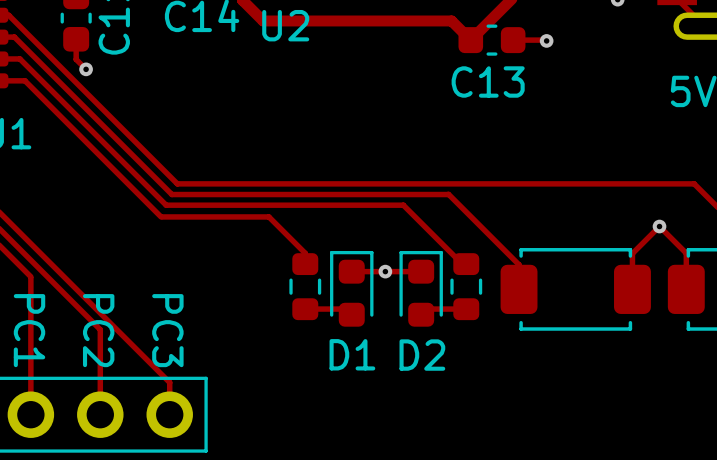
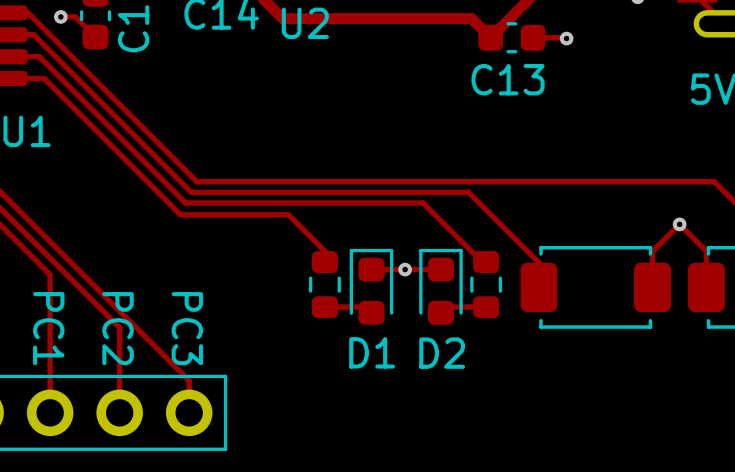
track: (76, 39) (76, 59) (86, 69) -> (95, 36) (75, 16) (60, 16)
via position: (86, 69) -> (60, 16)

